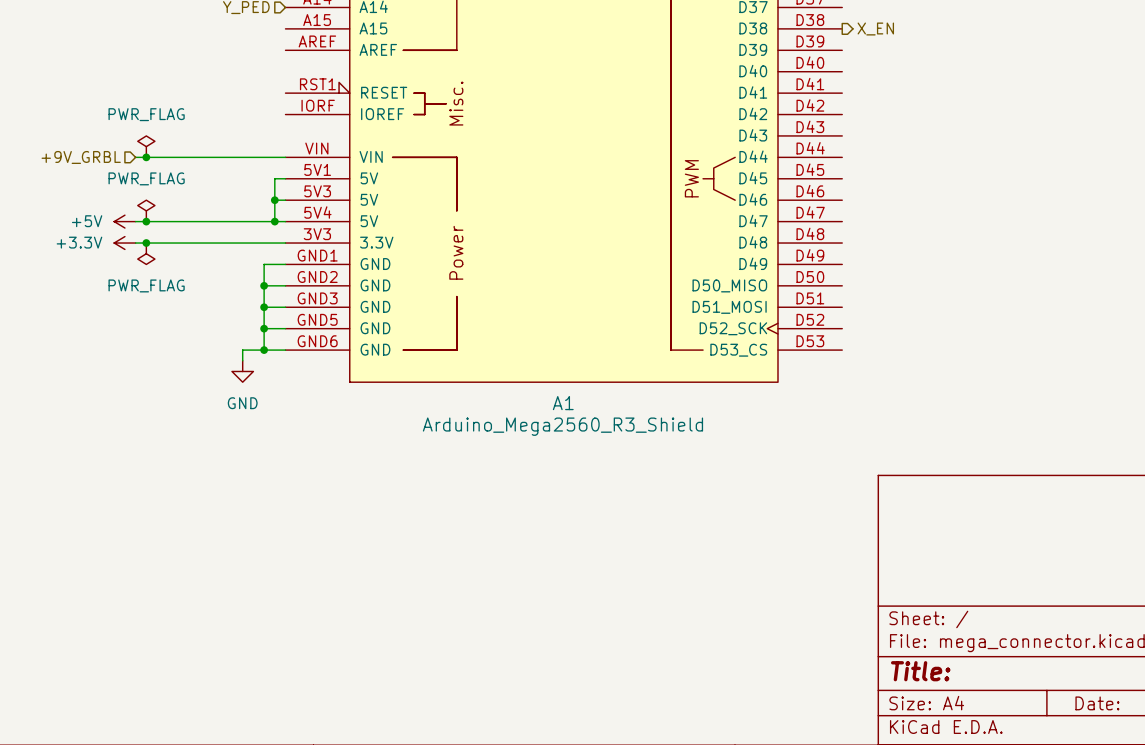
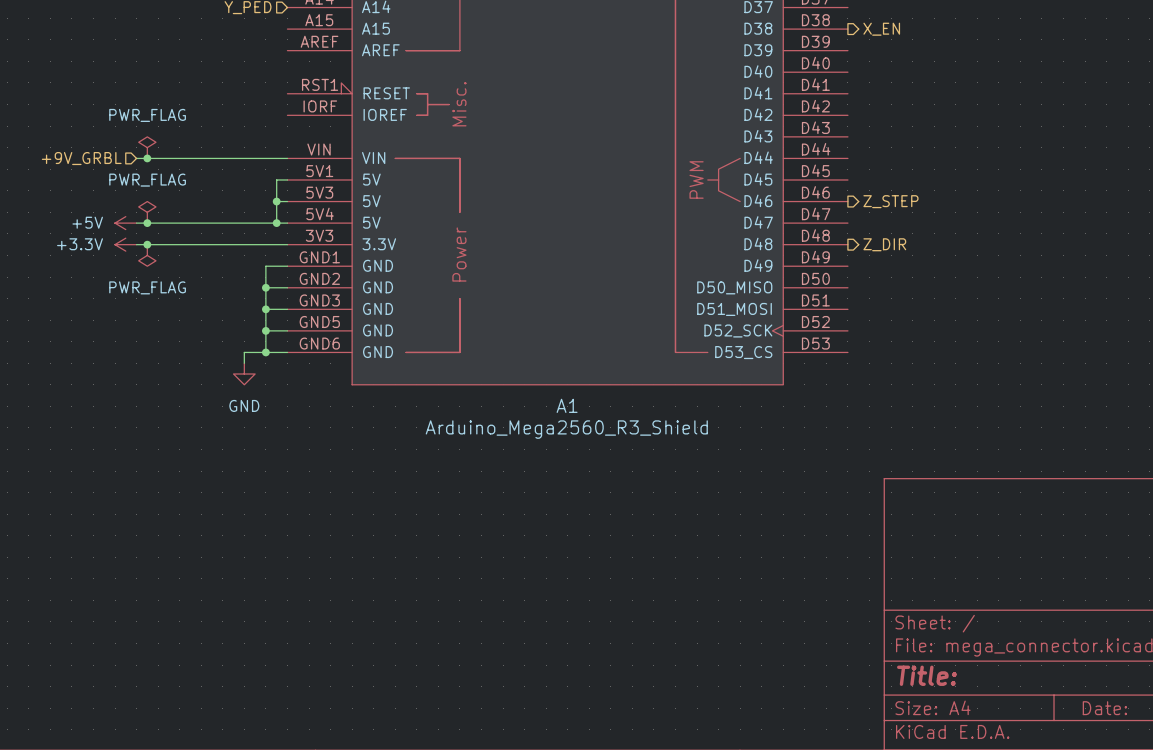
hierarchical label: none -> Z_STEP (890, 201)
hierarchical label: none -> Z_DIR (884, 244)

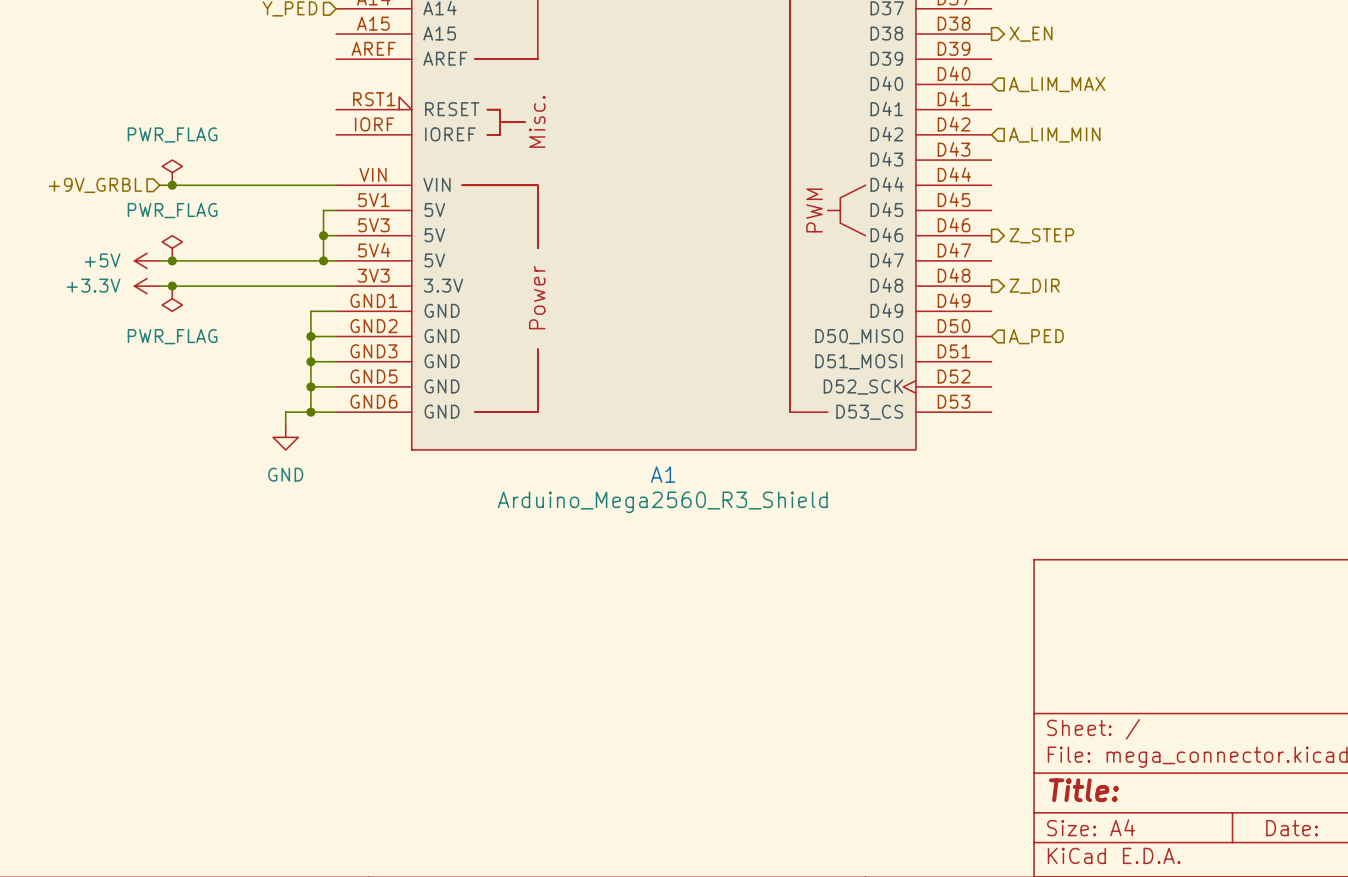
hierarchical label: none -> A_LIM_MAX (1057, 84)
hierarchical label: none -> A_LIM_MIN (1054, 134)
hierarchical label: none -> A_PED (1036, 336)

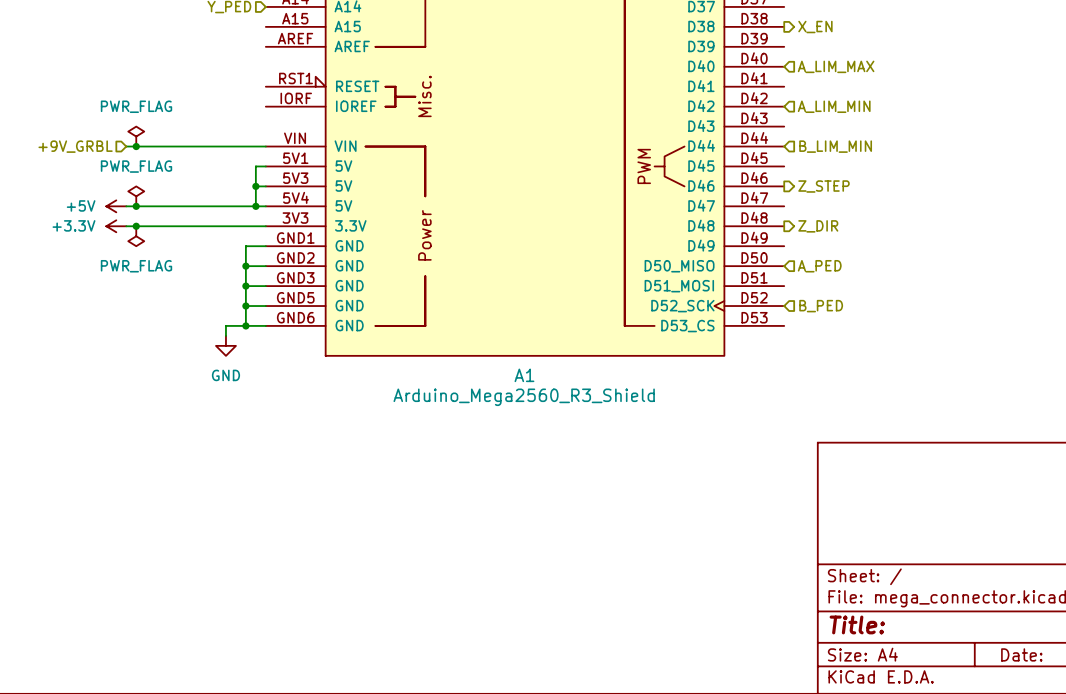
hierarchical label: none -> B_LIM_MIN (835, 146)
hierarchical label: none -> B_PED (821, 306)

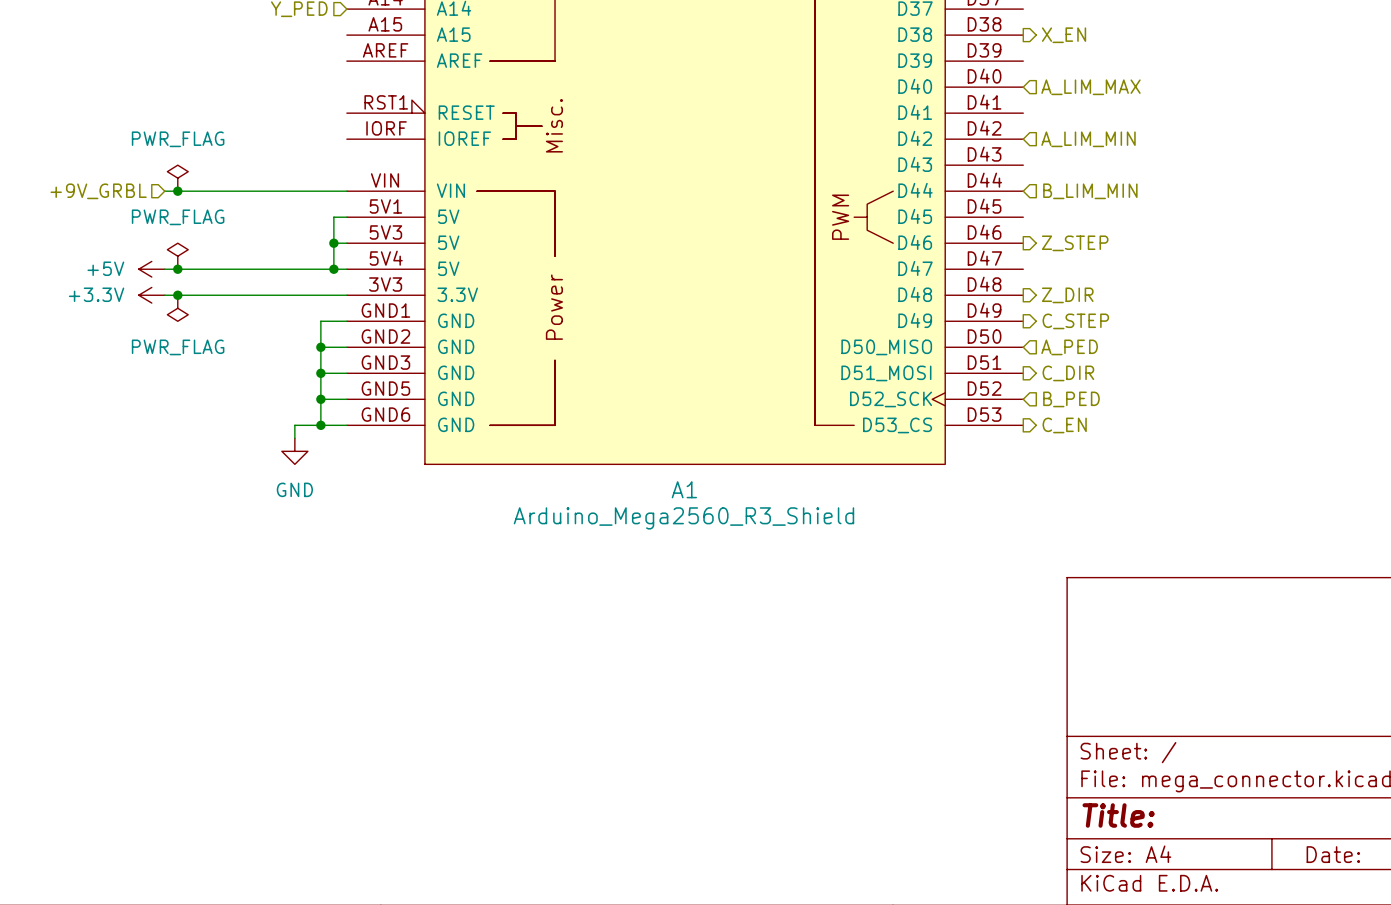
hierarchical label: none -> C_STEP (1075, 321)
hierarchical label: none -> C_DIR (1068, 373)
hierarchical label: none -> C_EN (1064, 425)

